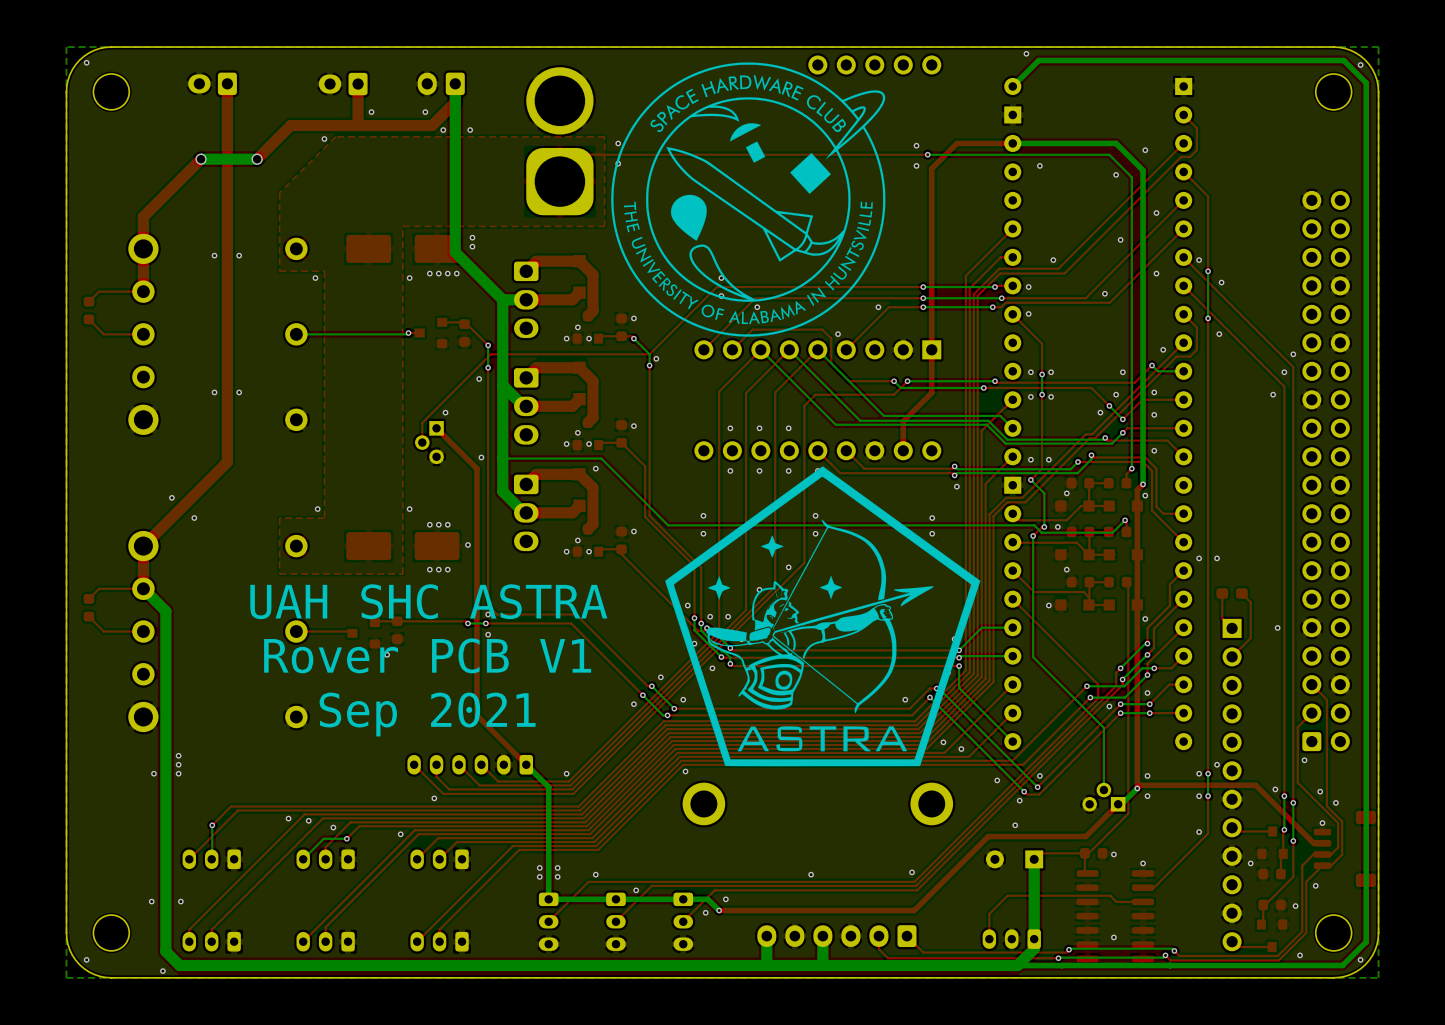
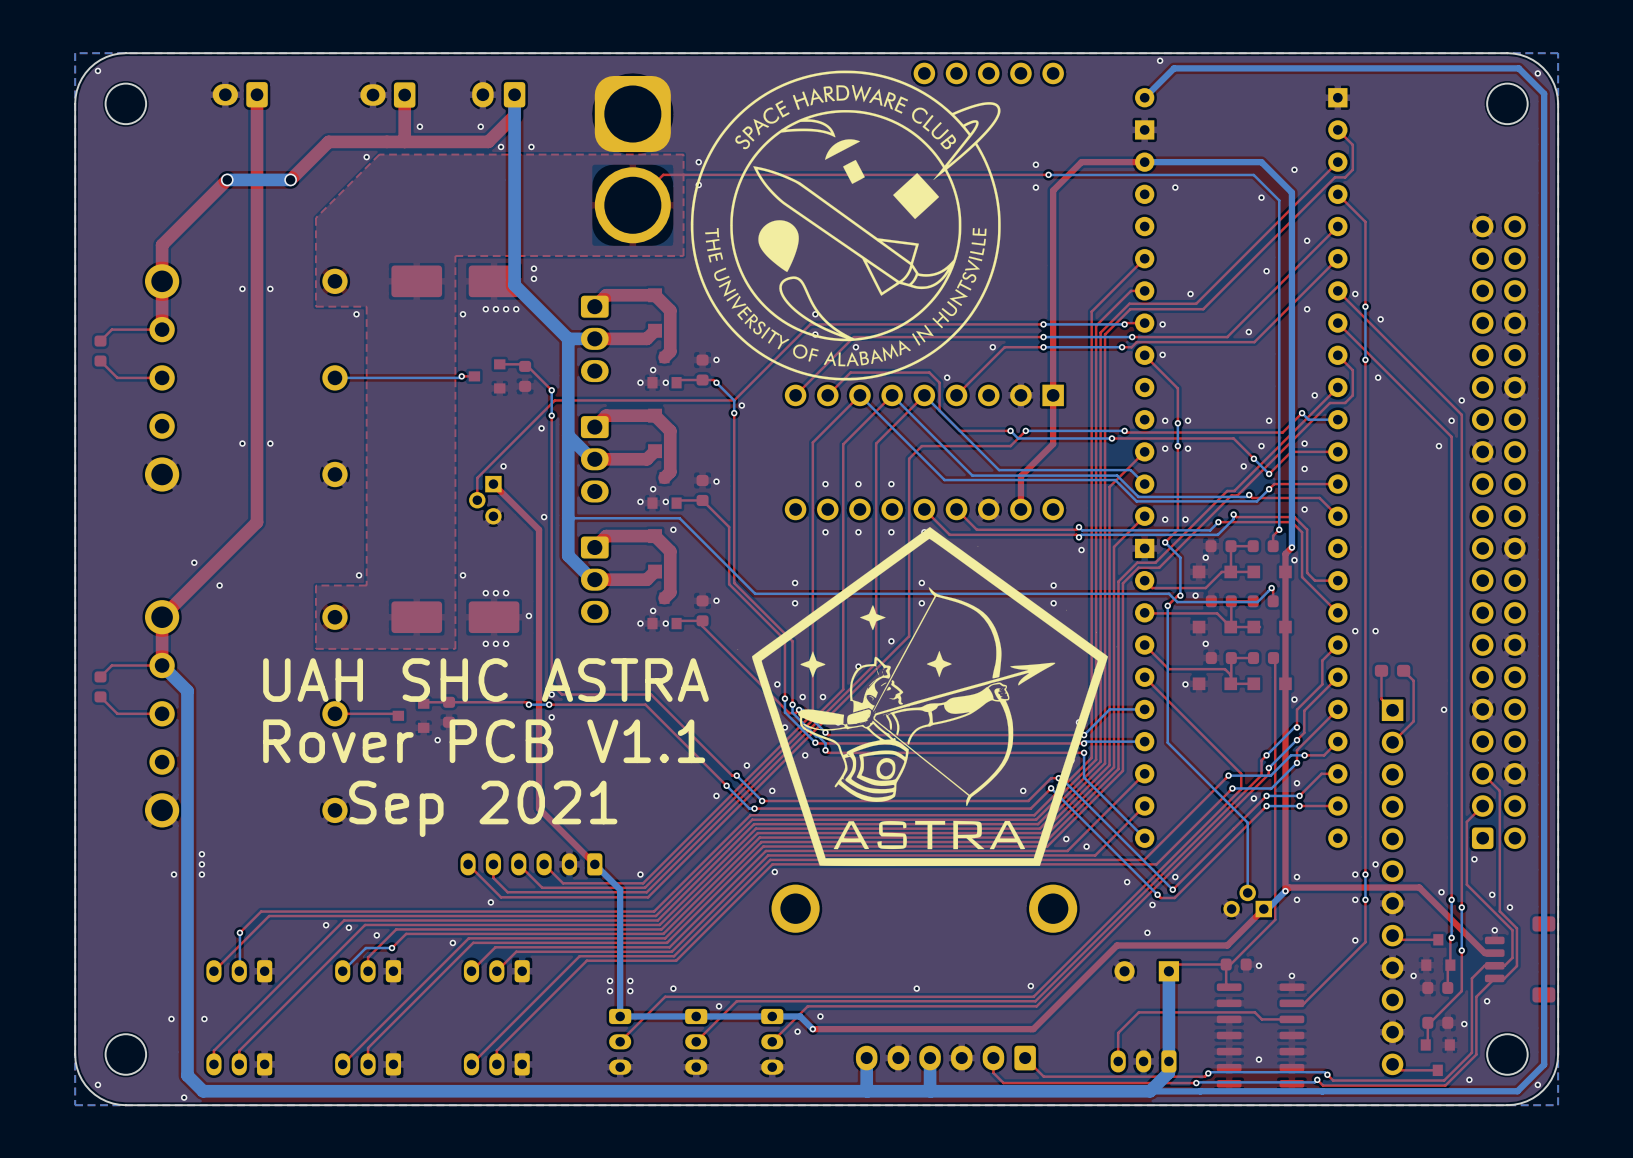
part rotation: 0° (559, 141) -> 180° (632, 159)
text: Rover PCB V1 (427, 655) -> Rover PCB V1.1 (484, 741)

